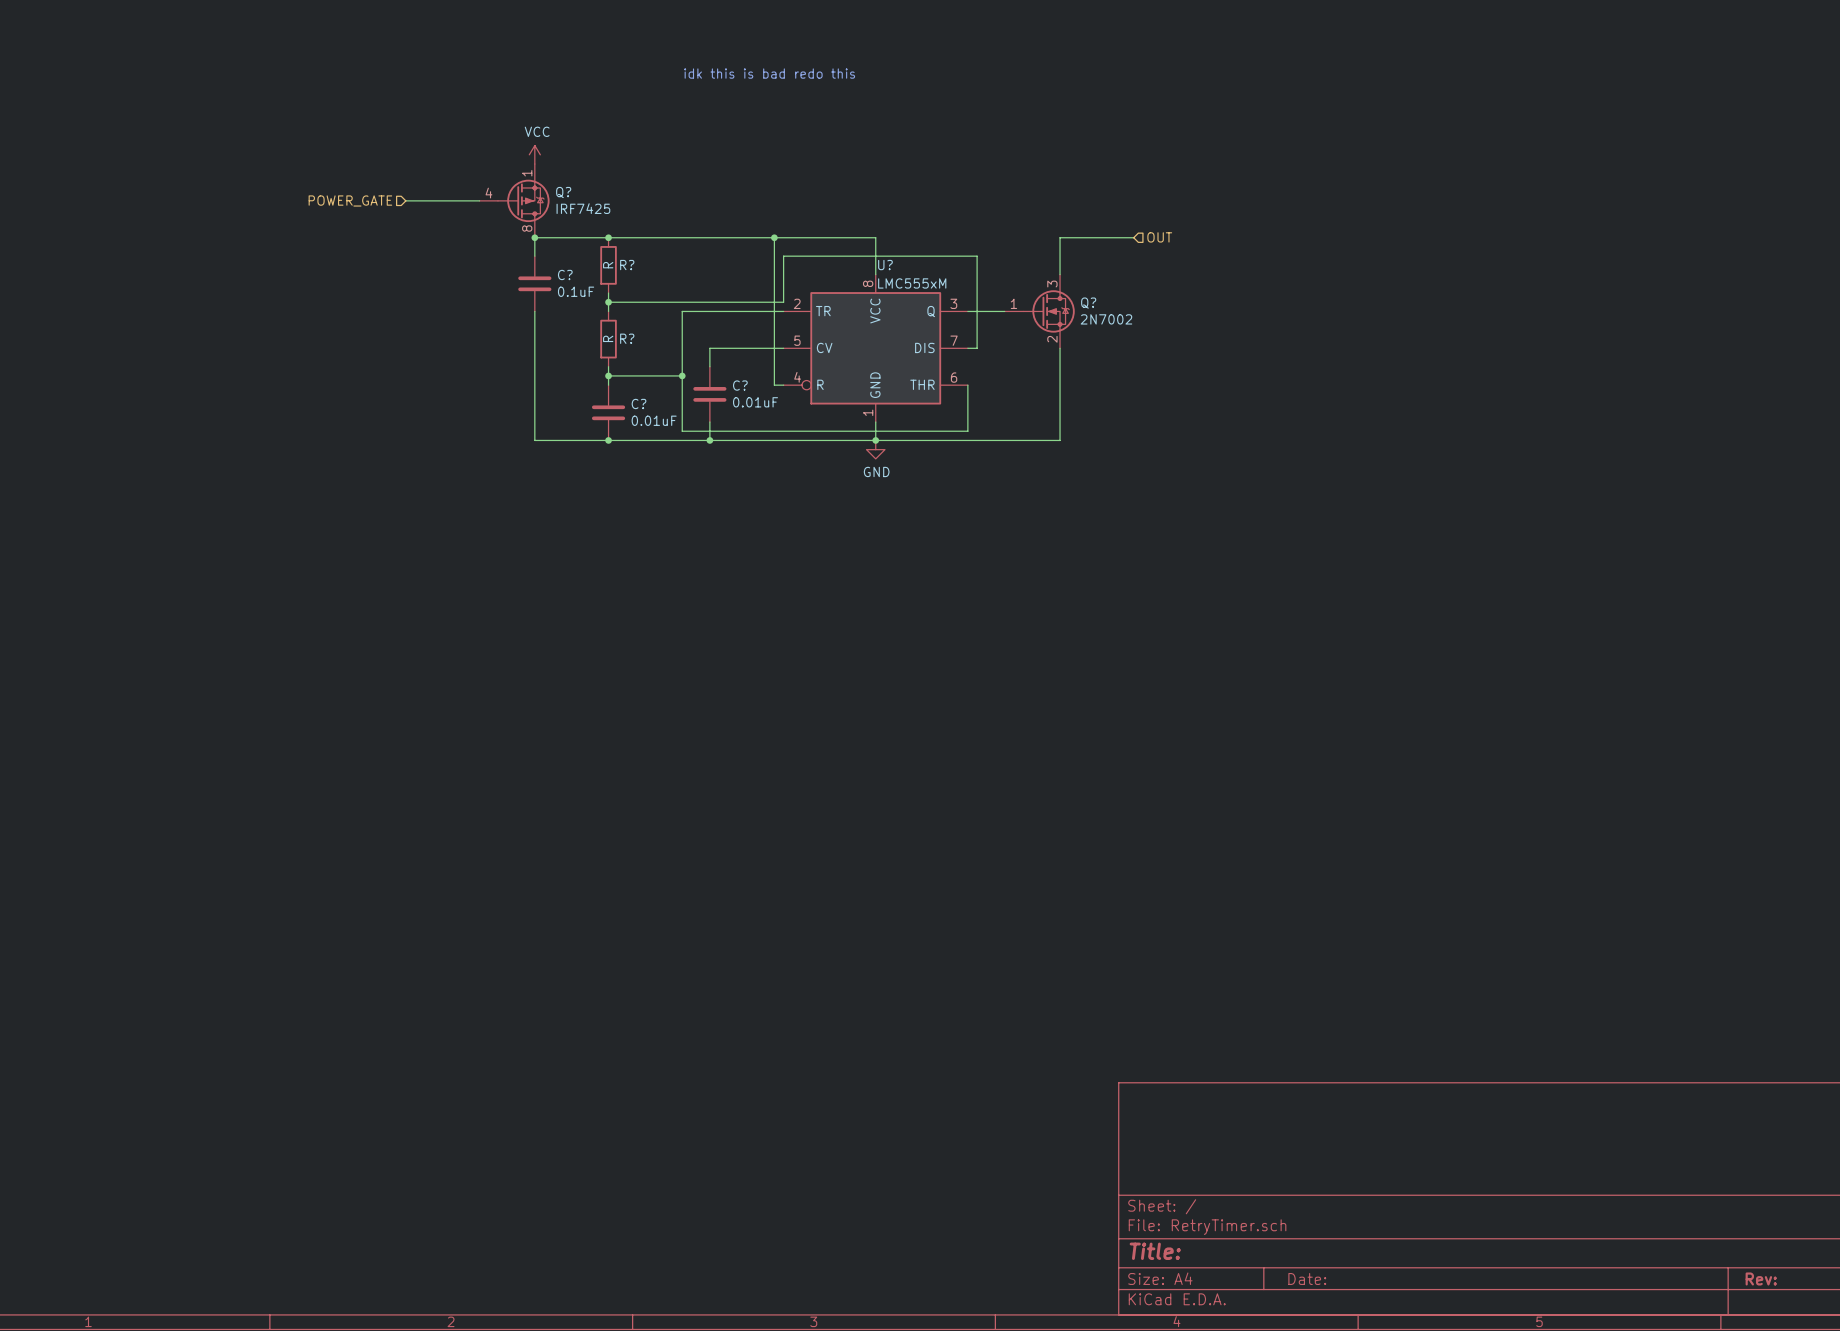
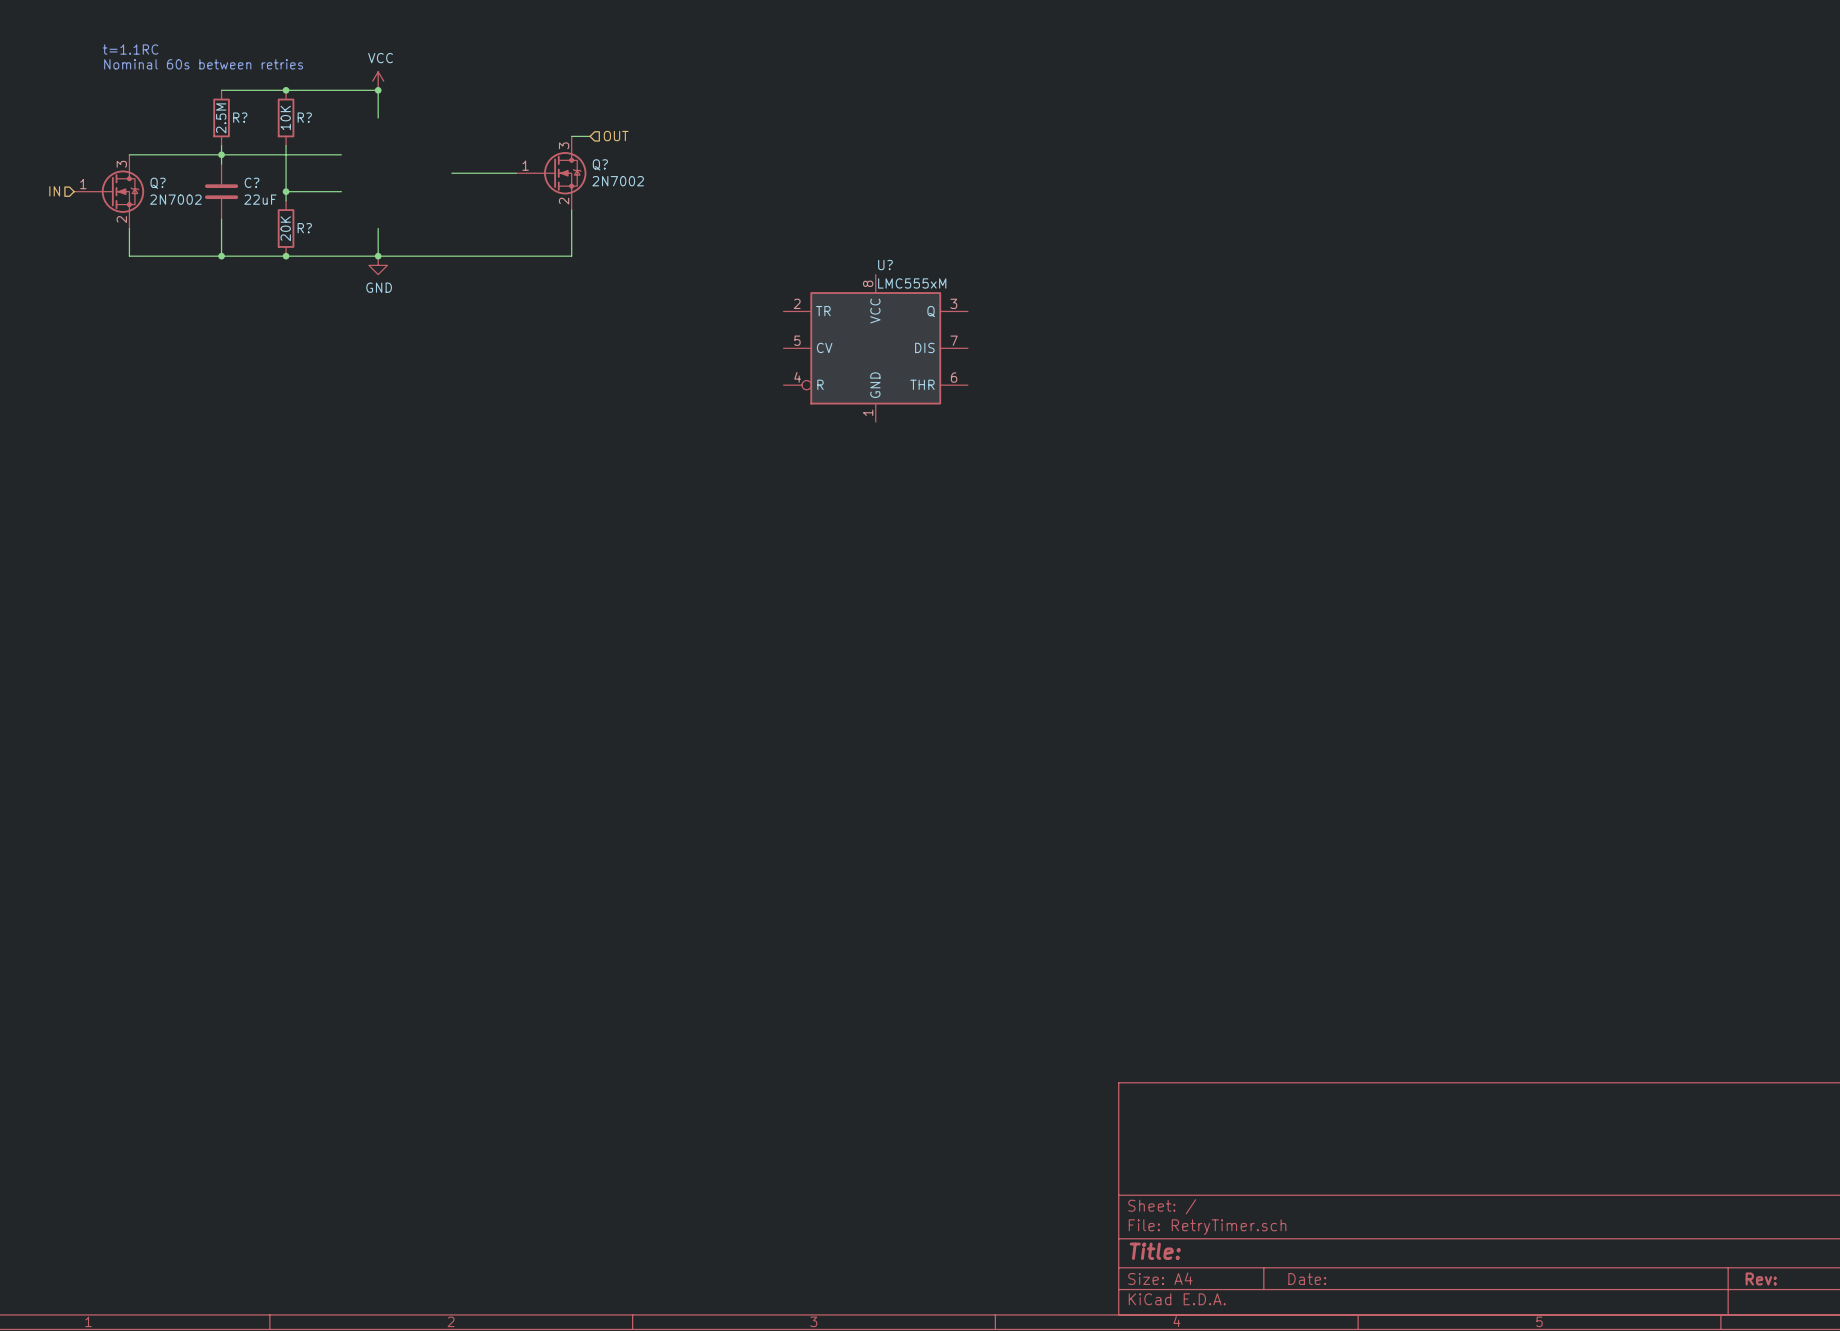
text: none -> t=1.1RC (130, 49)
text: none -> Nominal 60s between retries (203, 64)
text: idk this is bad redo this (769, 73) -> none
wire: none -> (221, 90) (378, 90) (378, 117)
junction: none -> (286, 90)
junction: none -> (378, 90)
R?: none -> 2.5M (221, 117)
R?: none -> 10K (286, 117)
wire: none -> (571, 136) (590, 136)
hierarchical label: none -> OUT (616, 136)
wire: none -> (221, 145) (221, 164)
wire: none -> (286, 145) (286, 200)
wire: none -> (129, 154) (341, 154)
junction: none -> (221, 154)
power symbol position: VCC (534, 154) -> VCC (378, 81)
wire: none -> (451, 173) (516, 173)
Q?: none -> 2N7002 (551, 173)
hierarchical label: none -> IN (54, 191)
Q?: none -> 2N7002 (109, 191)
C?: none -> 22uF (221, 191)
wire: none -> (286, 191) (341, 191)
junction: none -> (286, 191)
hierarchical label: POWER_GATE (350, 200) -> none
wire: (405, 200) (479, 200) -> none
Q?: IRF7425 (514, 200) -> none
wire: none -> (571, 210) (571, 256) (129, 256) (129, 228)
wire: none -> (221, 219) (221, 256)
R?: none -> 20K (286, 228)
wire: none -> (378, 228) (378, 256)
junction: (534, 237) -> none
junction: (608, 237) -> none
wire: (774, 237) (774, 385) (783, 385) -> none
junction: (774, 237) -> none
wire: (1133, 237) (1060, 237) (1060, 274) -> none
hierarchical label: OUT (1159, 237) -> none
junction: none -> (221, 256)
junction: none -> (286, 256)
junction: none -> (378, 256)
wire: (534, 256) (534, 237) (875, 237) (875, 274) -> none
power symbol: none -> GND (378, 265)
R?: R (608, 265) -> none
C?: 0.1uF (534, 283) -> none
wire: (608, 293) (608, 311) -> none
wire: (608, 302) (783, 302) (783, 256) (977, 256) (977, 348) (967, 348) -> none
junction: (608, 302) -> none
wire: (534, 311) (534, 440) (1060, 440) (1060, 348) -> none
wire: (783, 311) (682, 311) (682, 431) (967, 431) (967, 385) -> none
wire: (967, 311) (1004, 311) -> none
Q?: 2N7002 (1039, 311) -> none
R?: R (608, 339) -> none
wire: (783, 348) (709, 348) (709, 366) -> none
wire: (608, 366) (608, 385) -> none
wire: (608, 375) (682, 375) -> none
junction: (608, 375) -> none
junction: (682, 375) -> none
C?: 0.01uF (709, 394) -> none
C?: 0.01uF (608, 412) -> none
wire: (709, 422) (709, 440) -> none
wire: (875, 422) (875, 440) -> none
junction: (608, 440) -> none
junction: (709, 440) -> none
junction: (875, 440) -> none
power symbol: GND (875, 449) -> none

